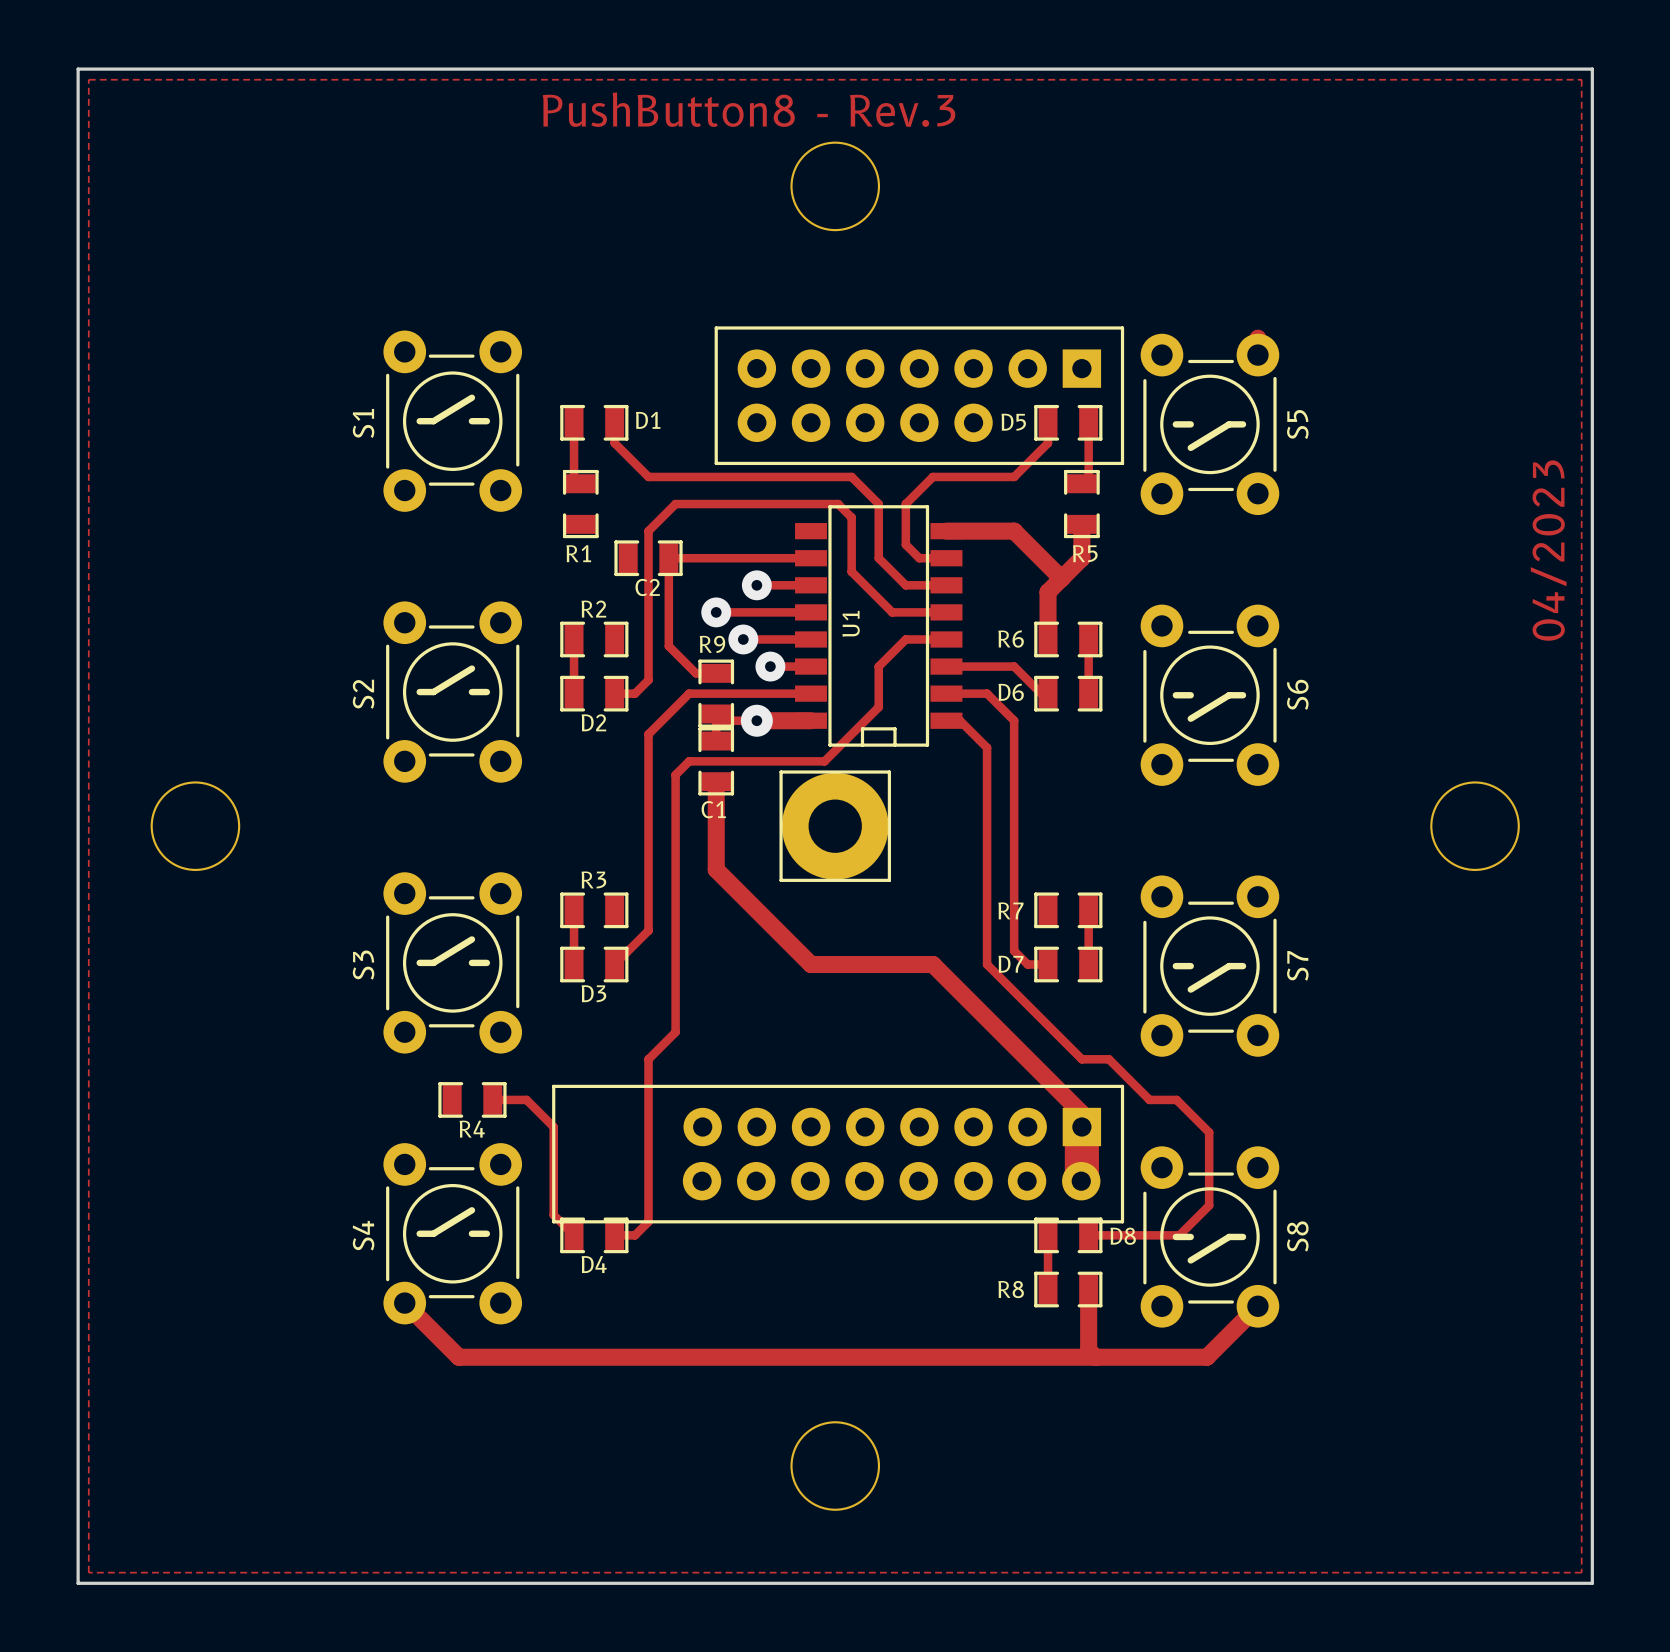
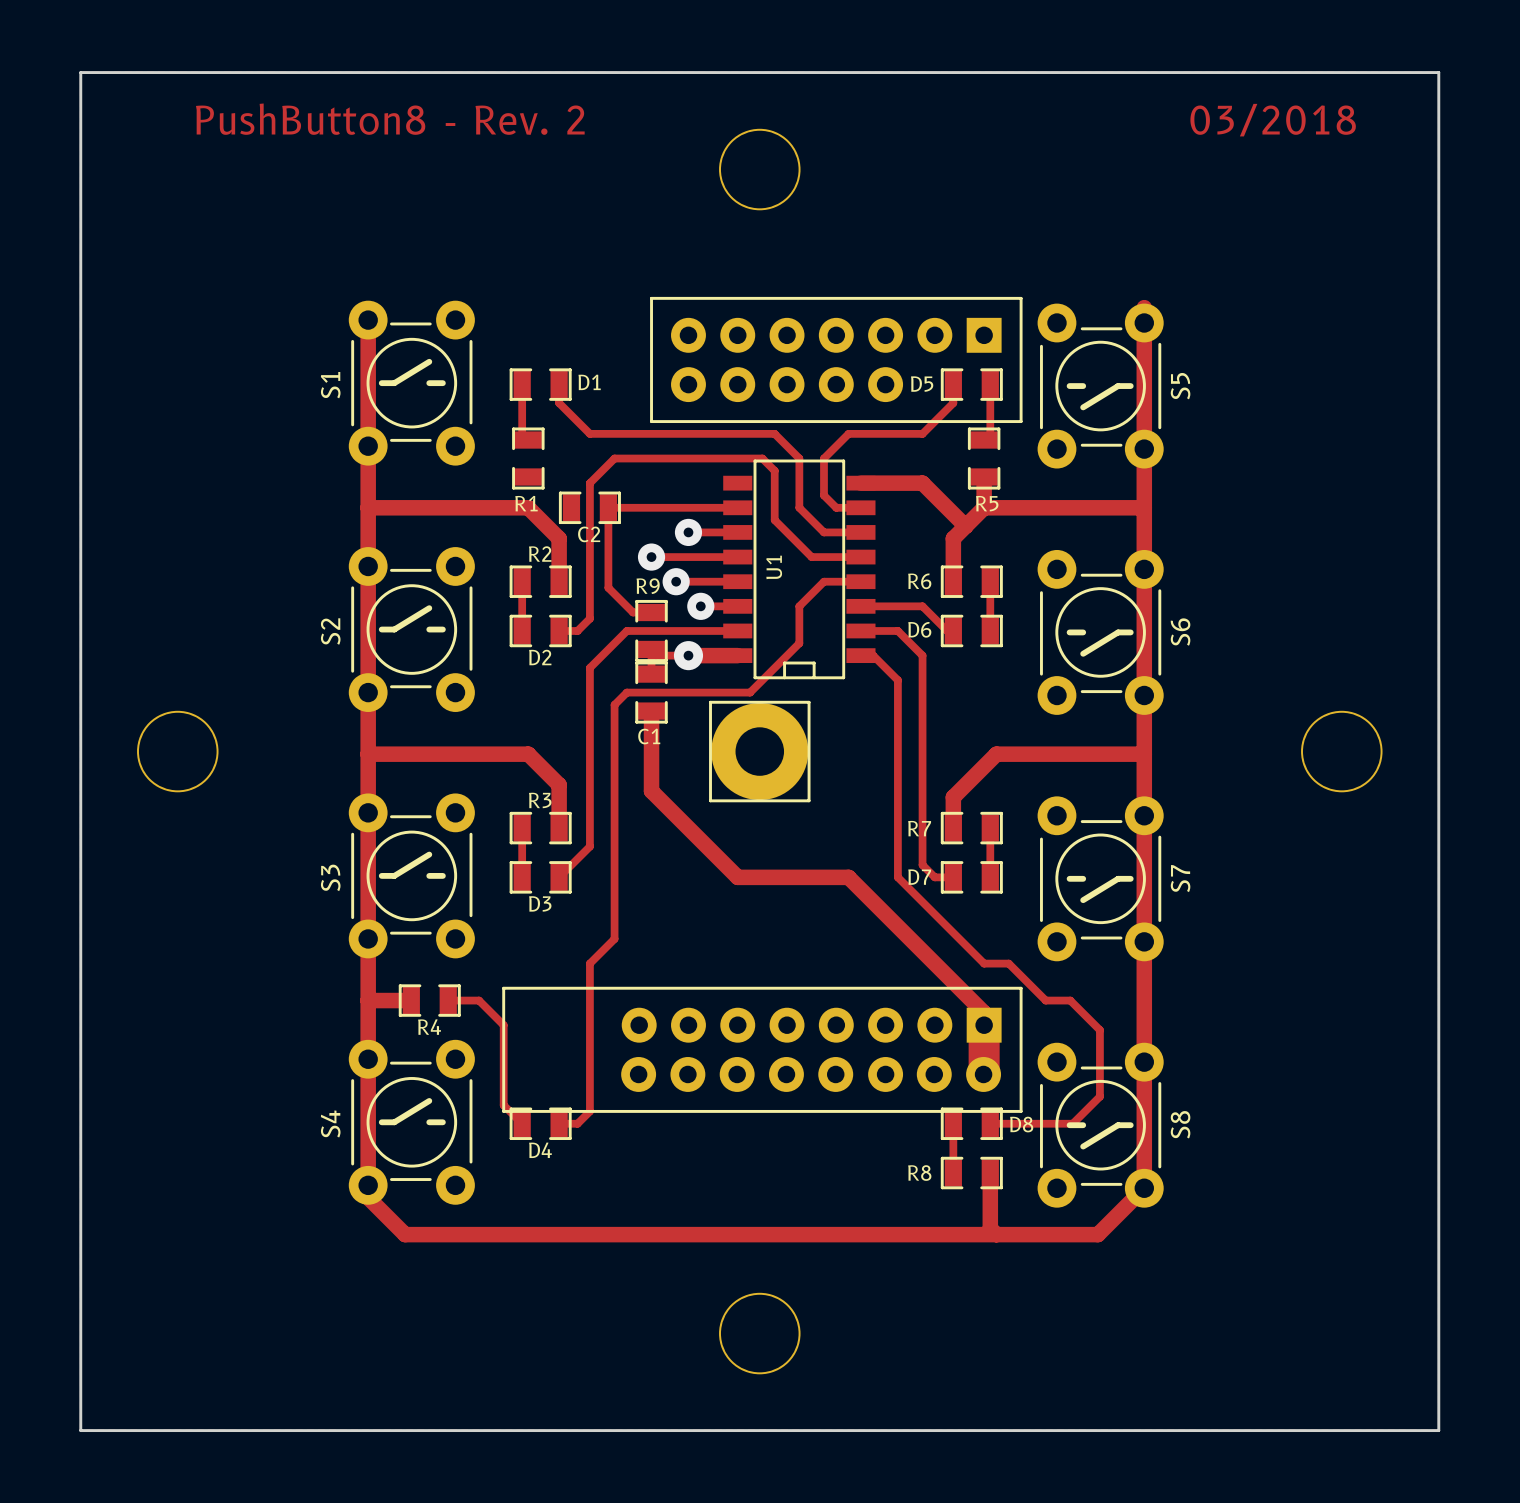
board edge: (78, 69) (1592, 69) (1592, 1583) (78, 1583) (78, 69) -> (80, 72) (80, 1430) (1438, 1430) (1438, 72) (80, 72)
text: PushButton8 - Rev.3 (749, 109) -> PushButton8 - Rev. 2 (390, 119)
text: none -> 03/2018 (1273, 120)
track: none -> (1144, 323) (1144, 1188)
text: 04/2023 (1548, 550) -> none
track: none -> (368, 507) (528, 507) (559, 538) (559, 581)
track: none -> (984, 507) (1144, 507)
track: none -> (368, 754) (528, 754) (559, 784) (559, 828)
track: none -> (1144, 754) (996, 754) (953, 797) (953, 828)
track: none -> (368, 1000) (411, 1000)
track: (404, 1303) (458, 1357) -> (368, 320) (368, 1197) (405, 1234) (417, 1234)

